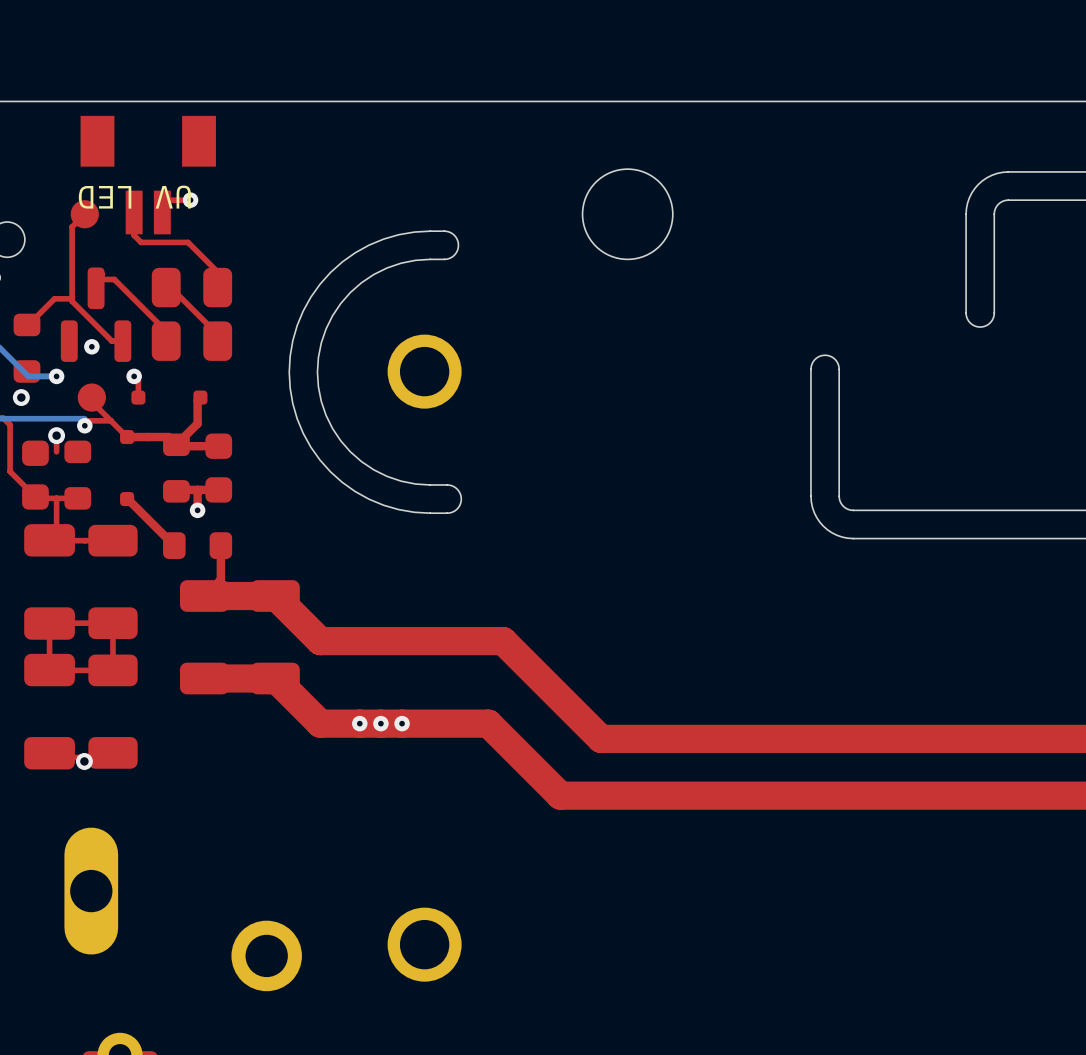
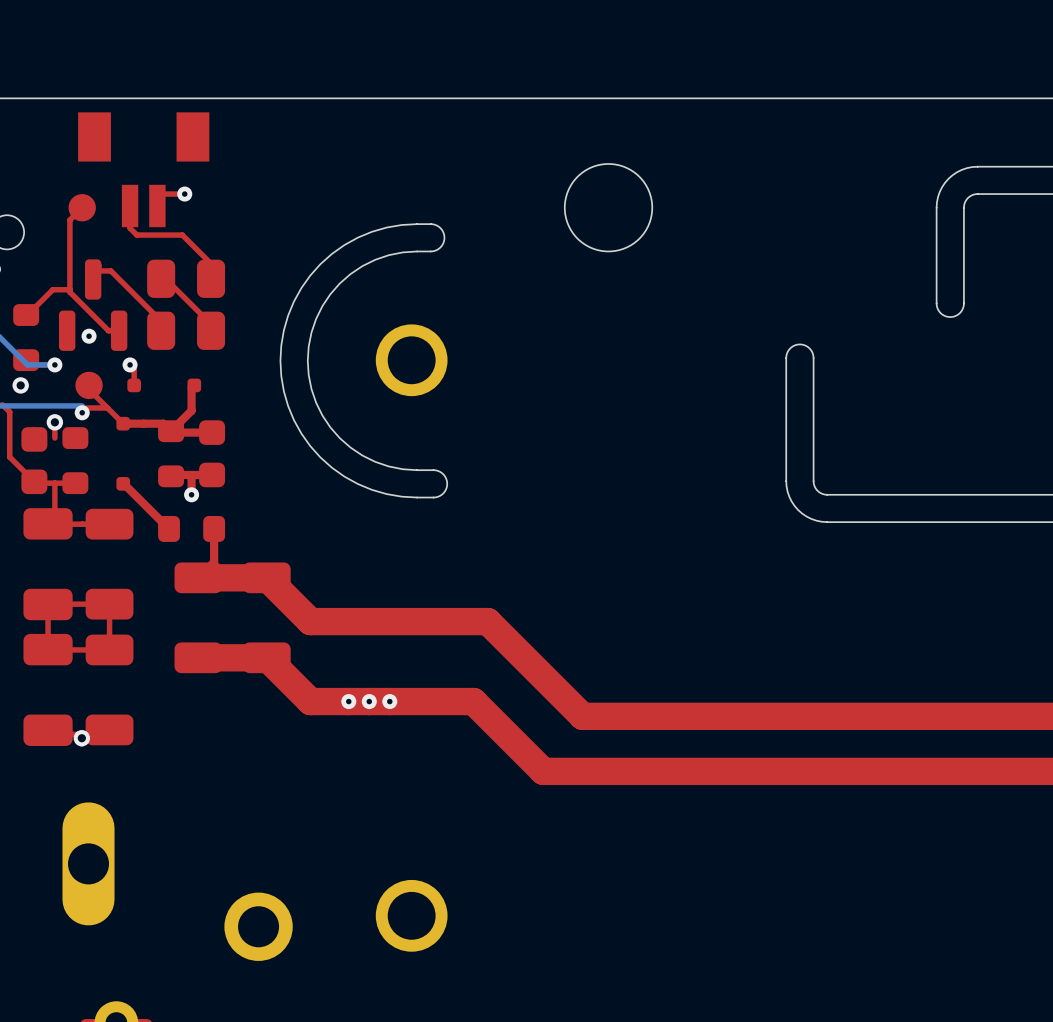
text: UV LED (134, 197) -> none

